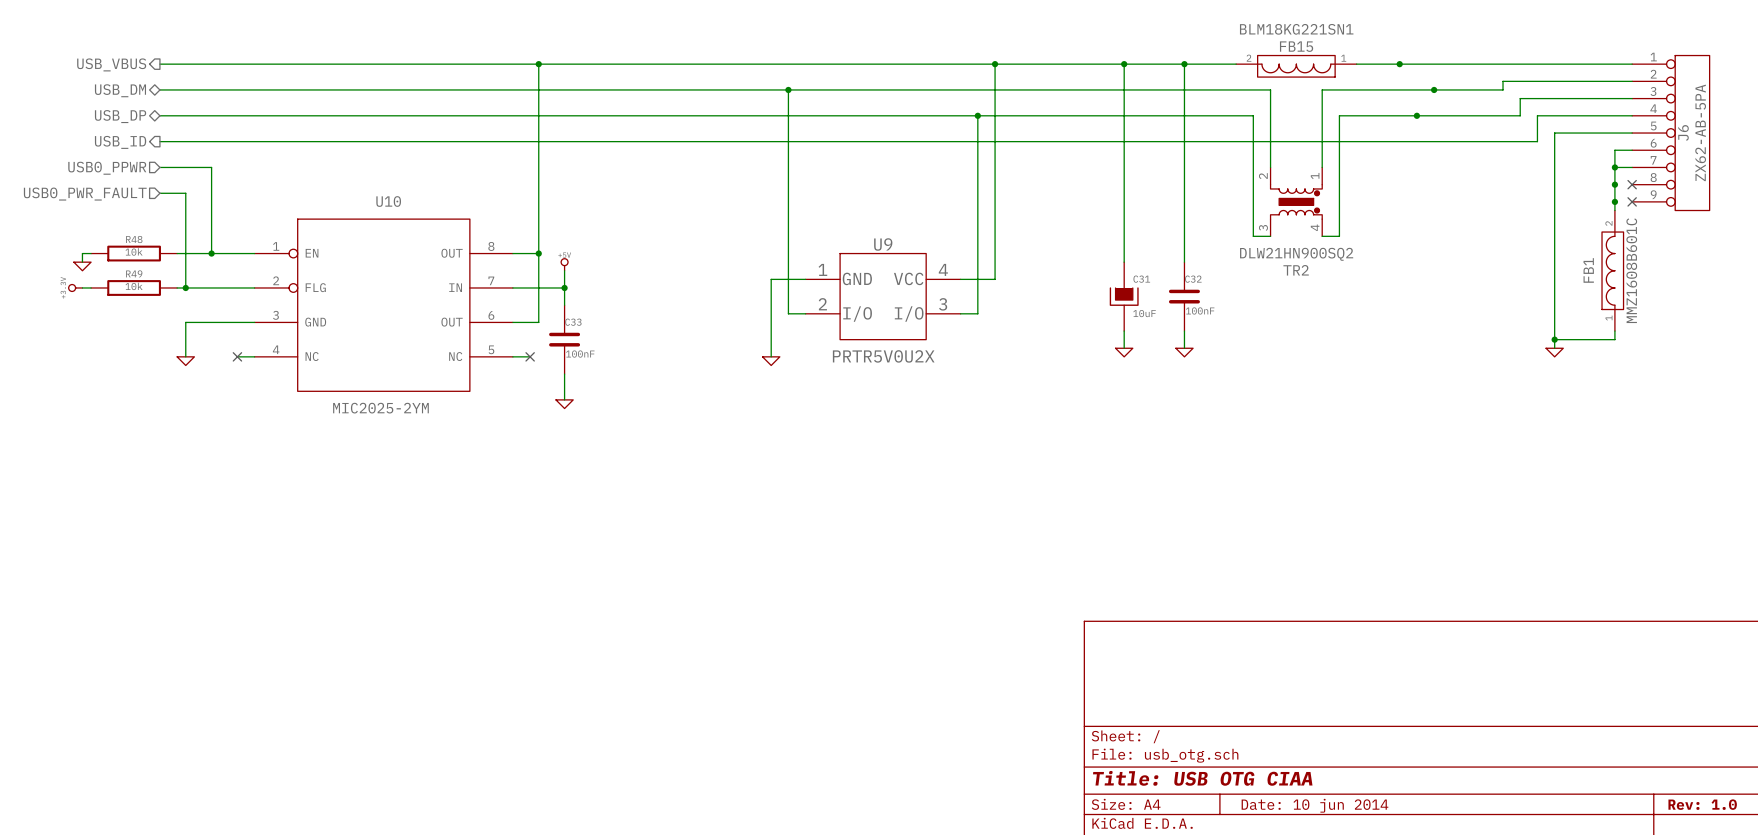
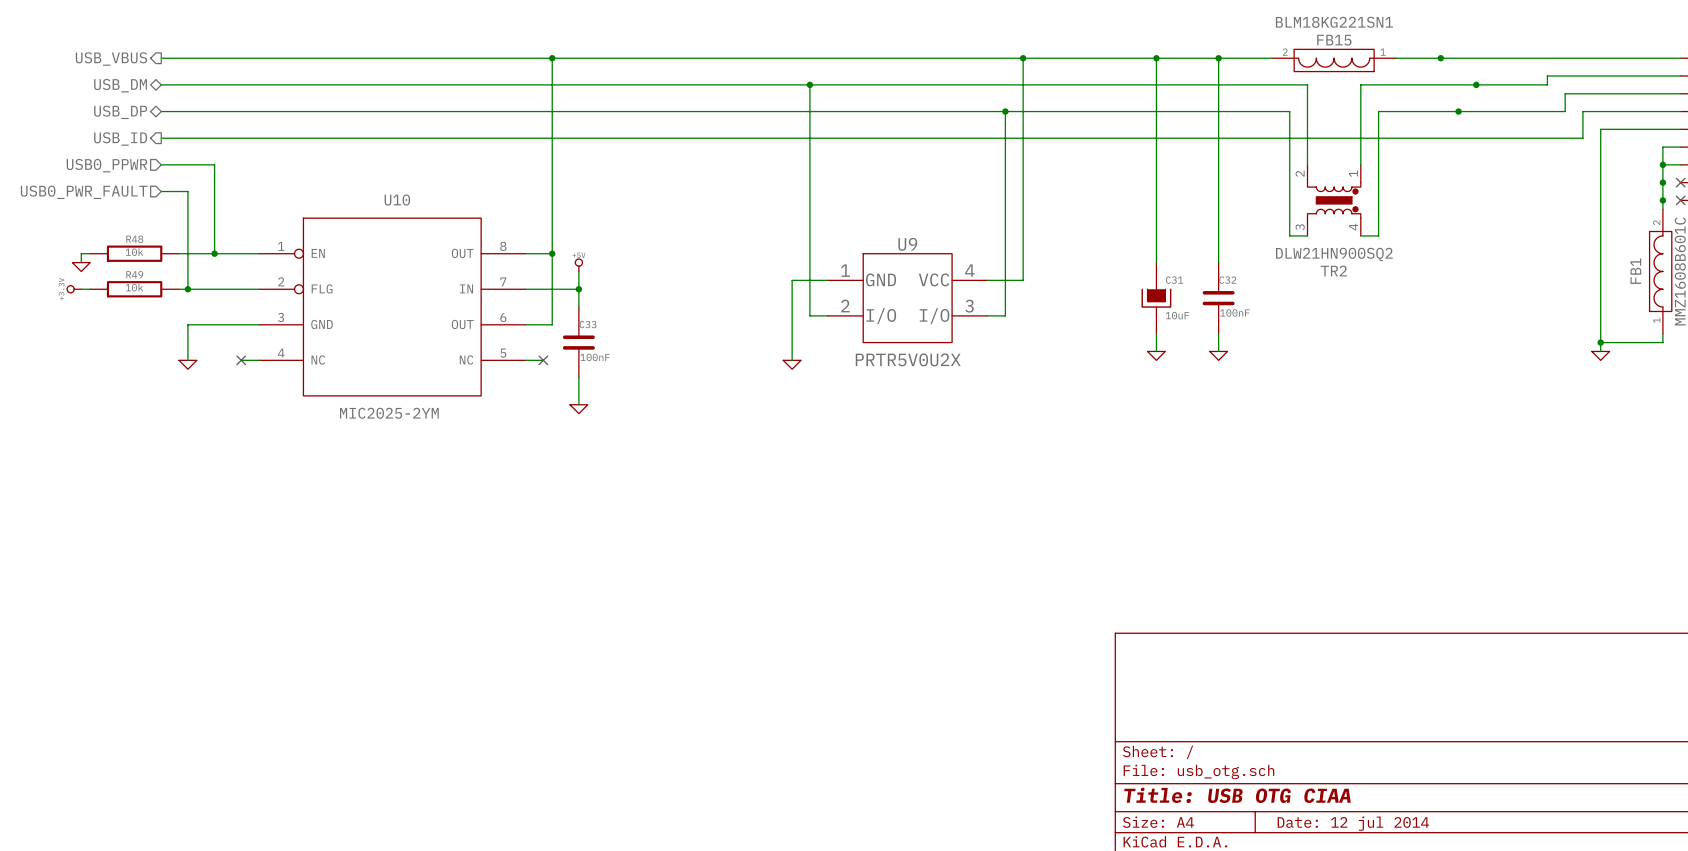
title block: Date: 10 jun 2014 (1314, 805) -> Date: 12 jul 2014 (1353, 823)

